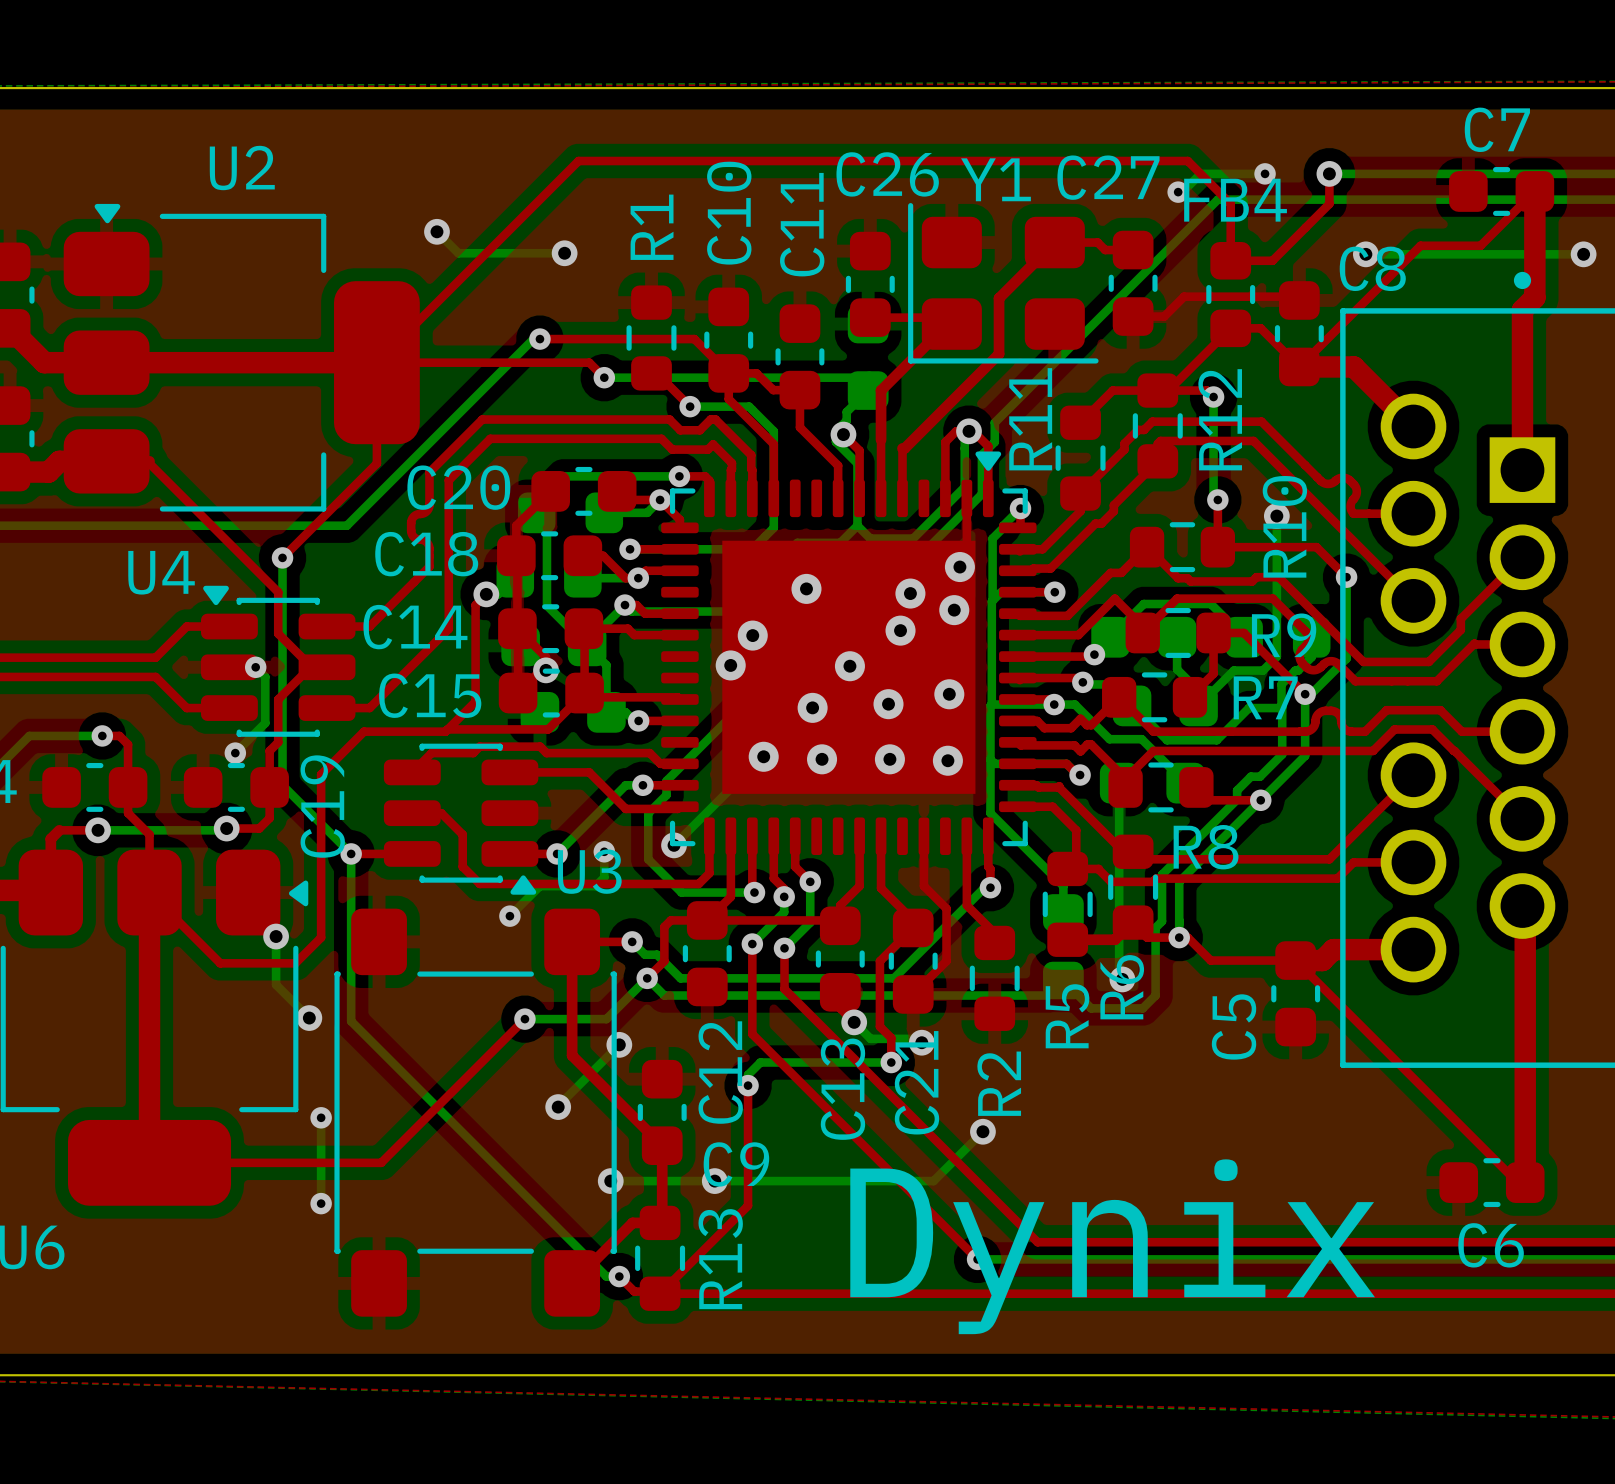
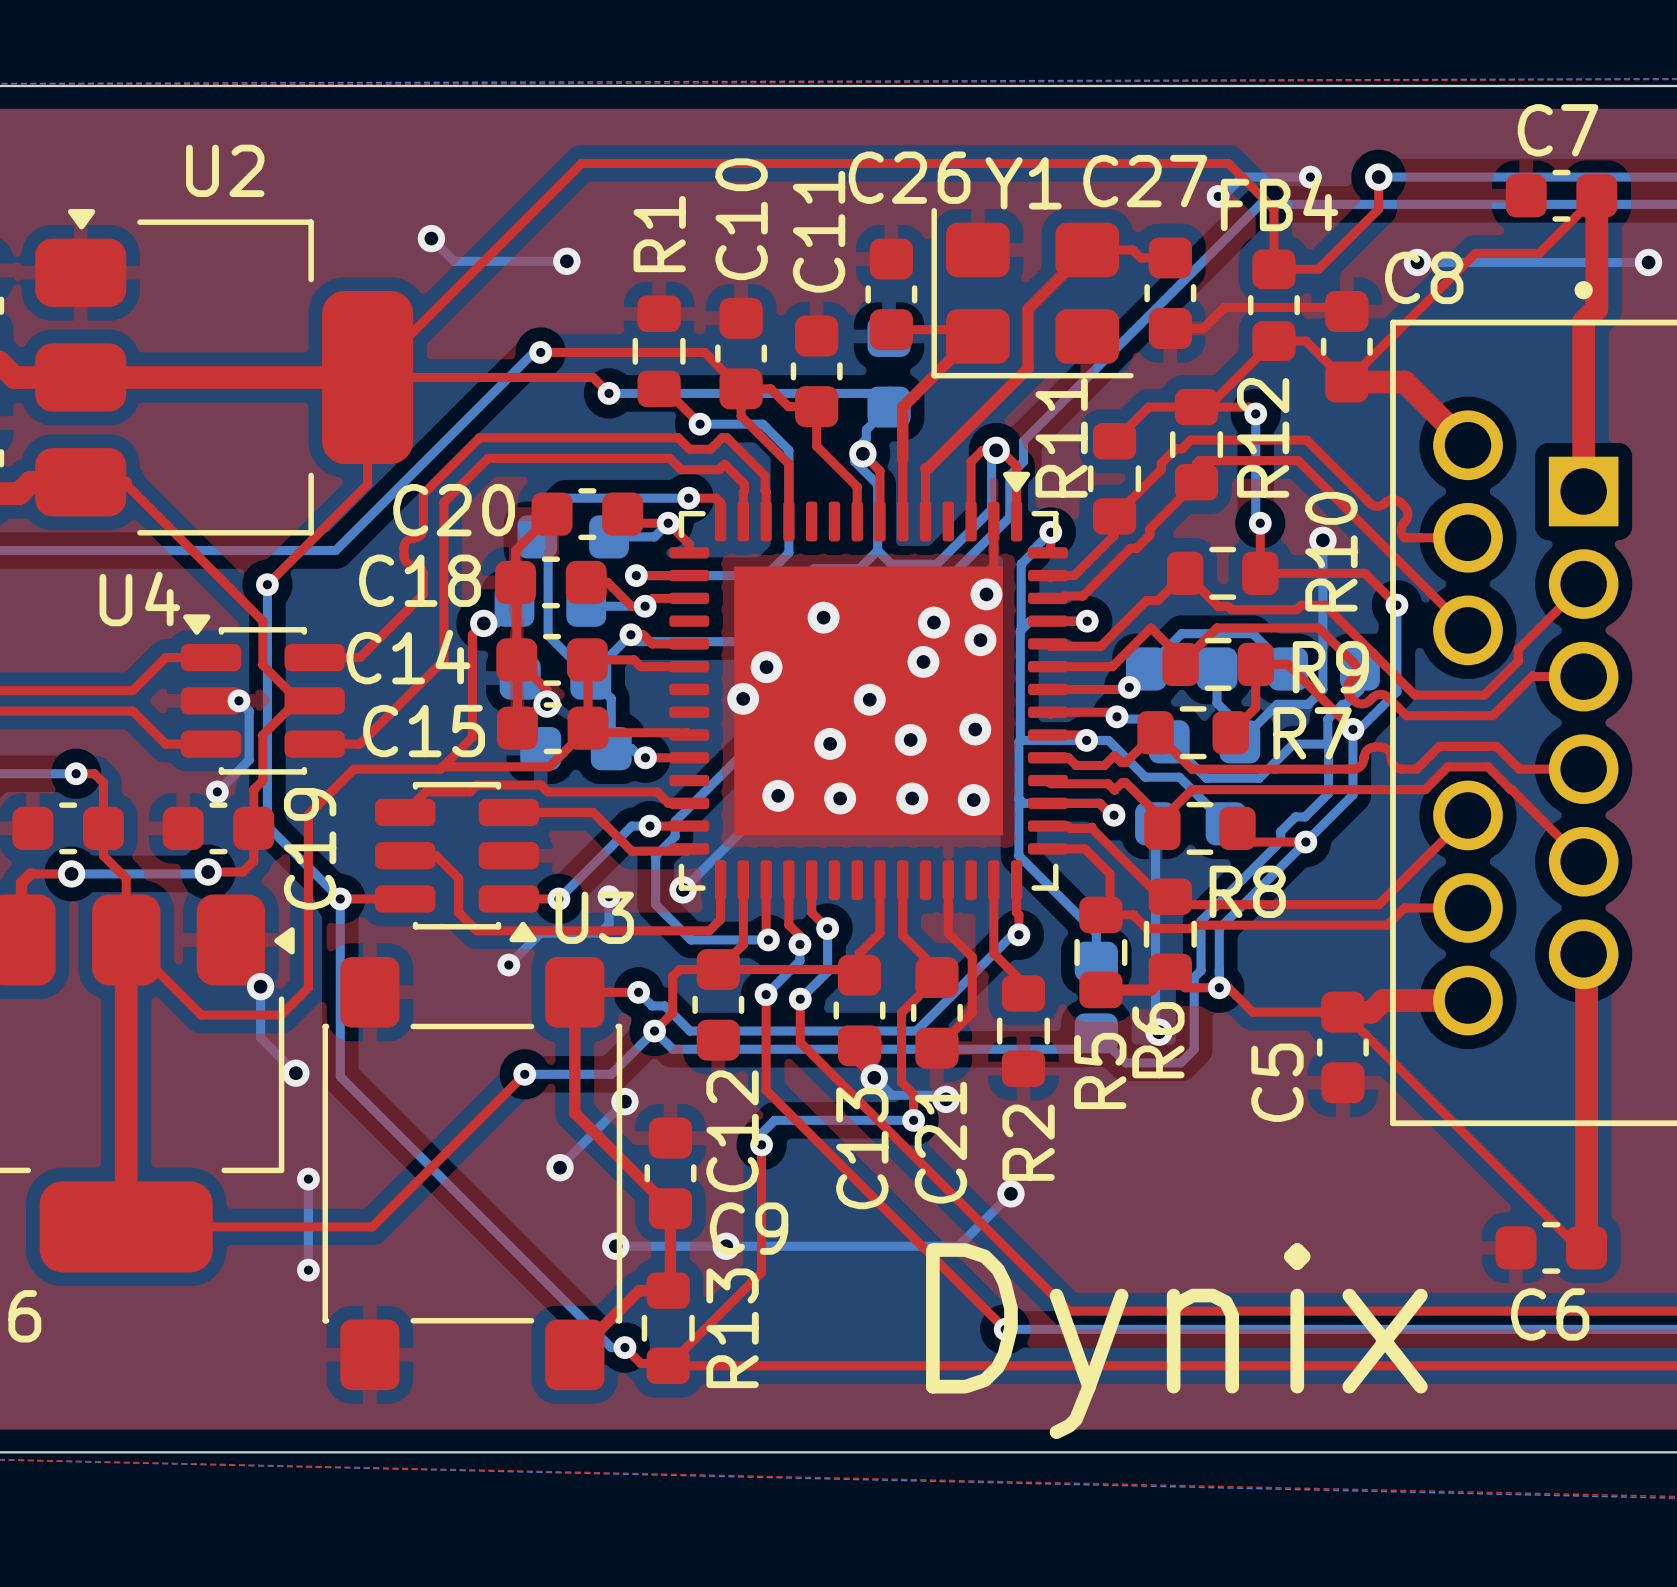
text position: Dynix (1112, 1246) -> Dynix (1176, 1341)

